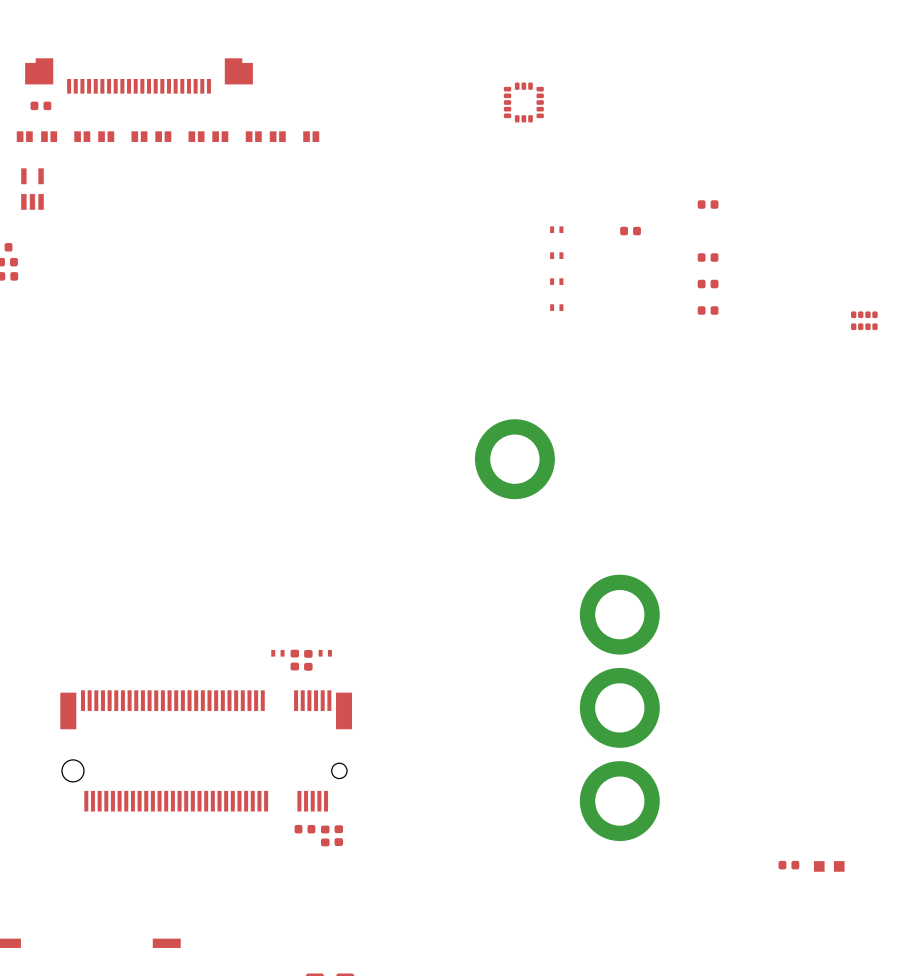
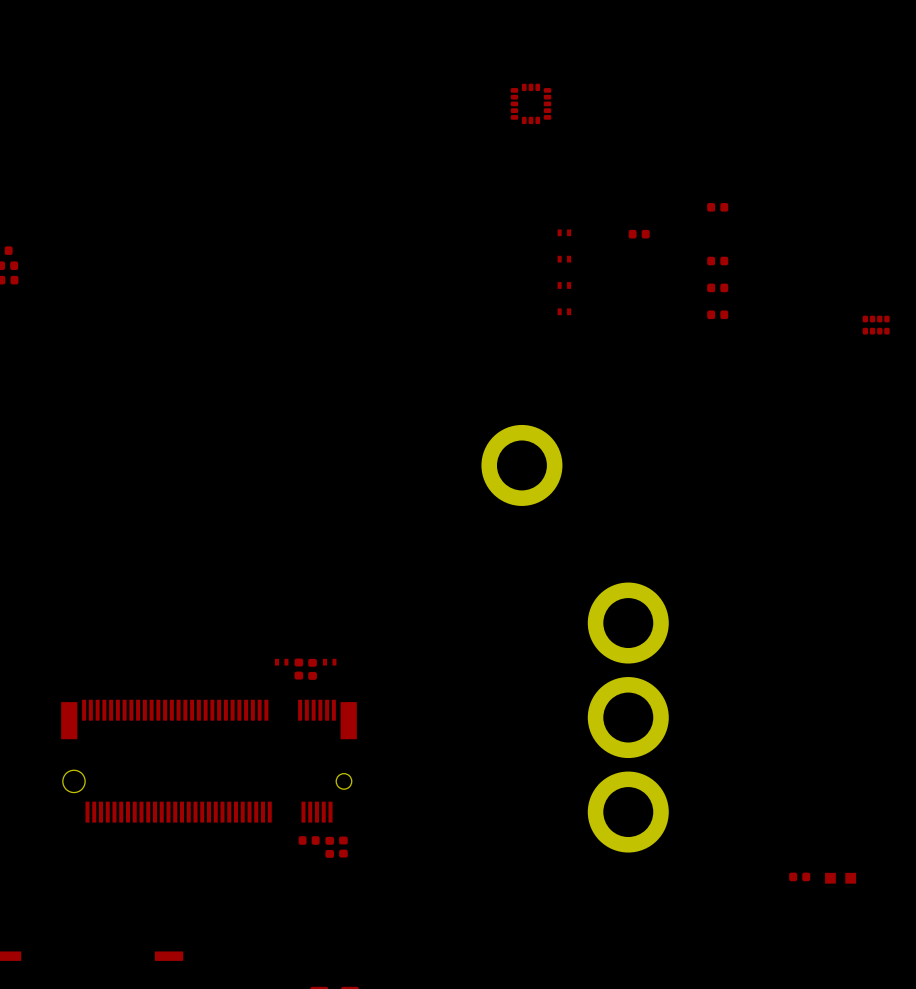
part: (139, 75) -> none
part: (40, 105) -> none
part: (24, 136) -> none
part: (49, 136) -> none
part: (82, 136) -> none
part: (106, 136) -> none
part: (139, 136) -> none
part: (163, 136) -> none
part: (196, 136) -> none
part: (220, 136) -> none
part: (253, 136) -> none
part: (277, 136) -> none
part: (311, 136) -> none
part: (32, 189) -> none

